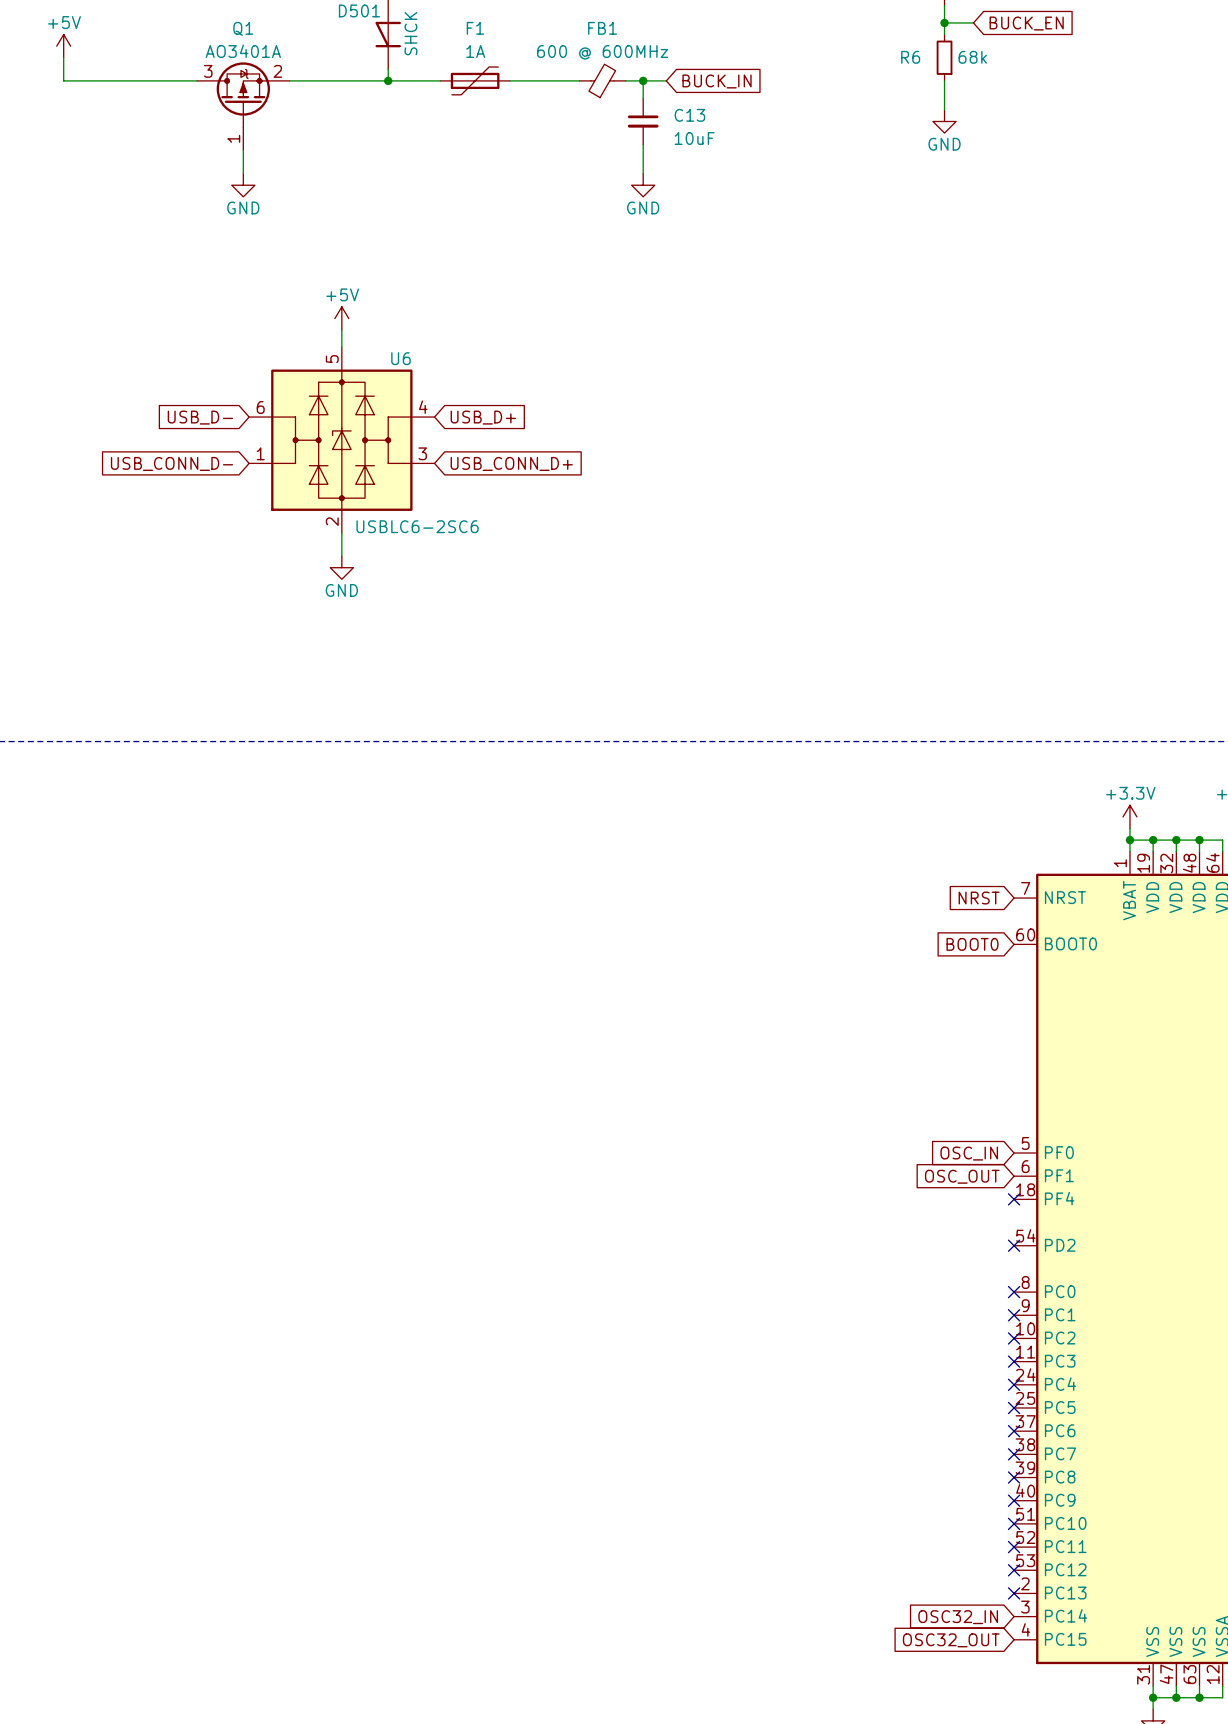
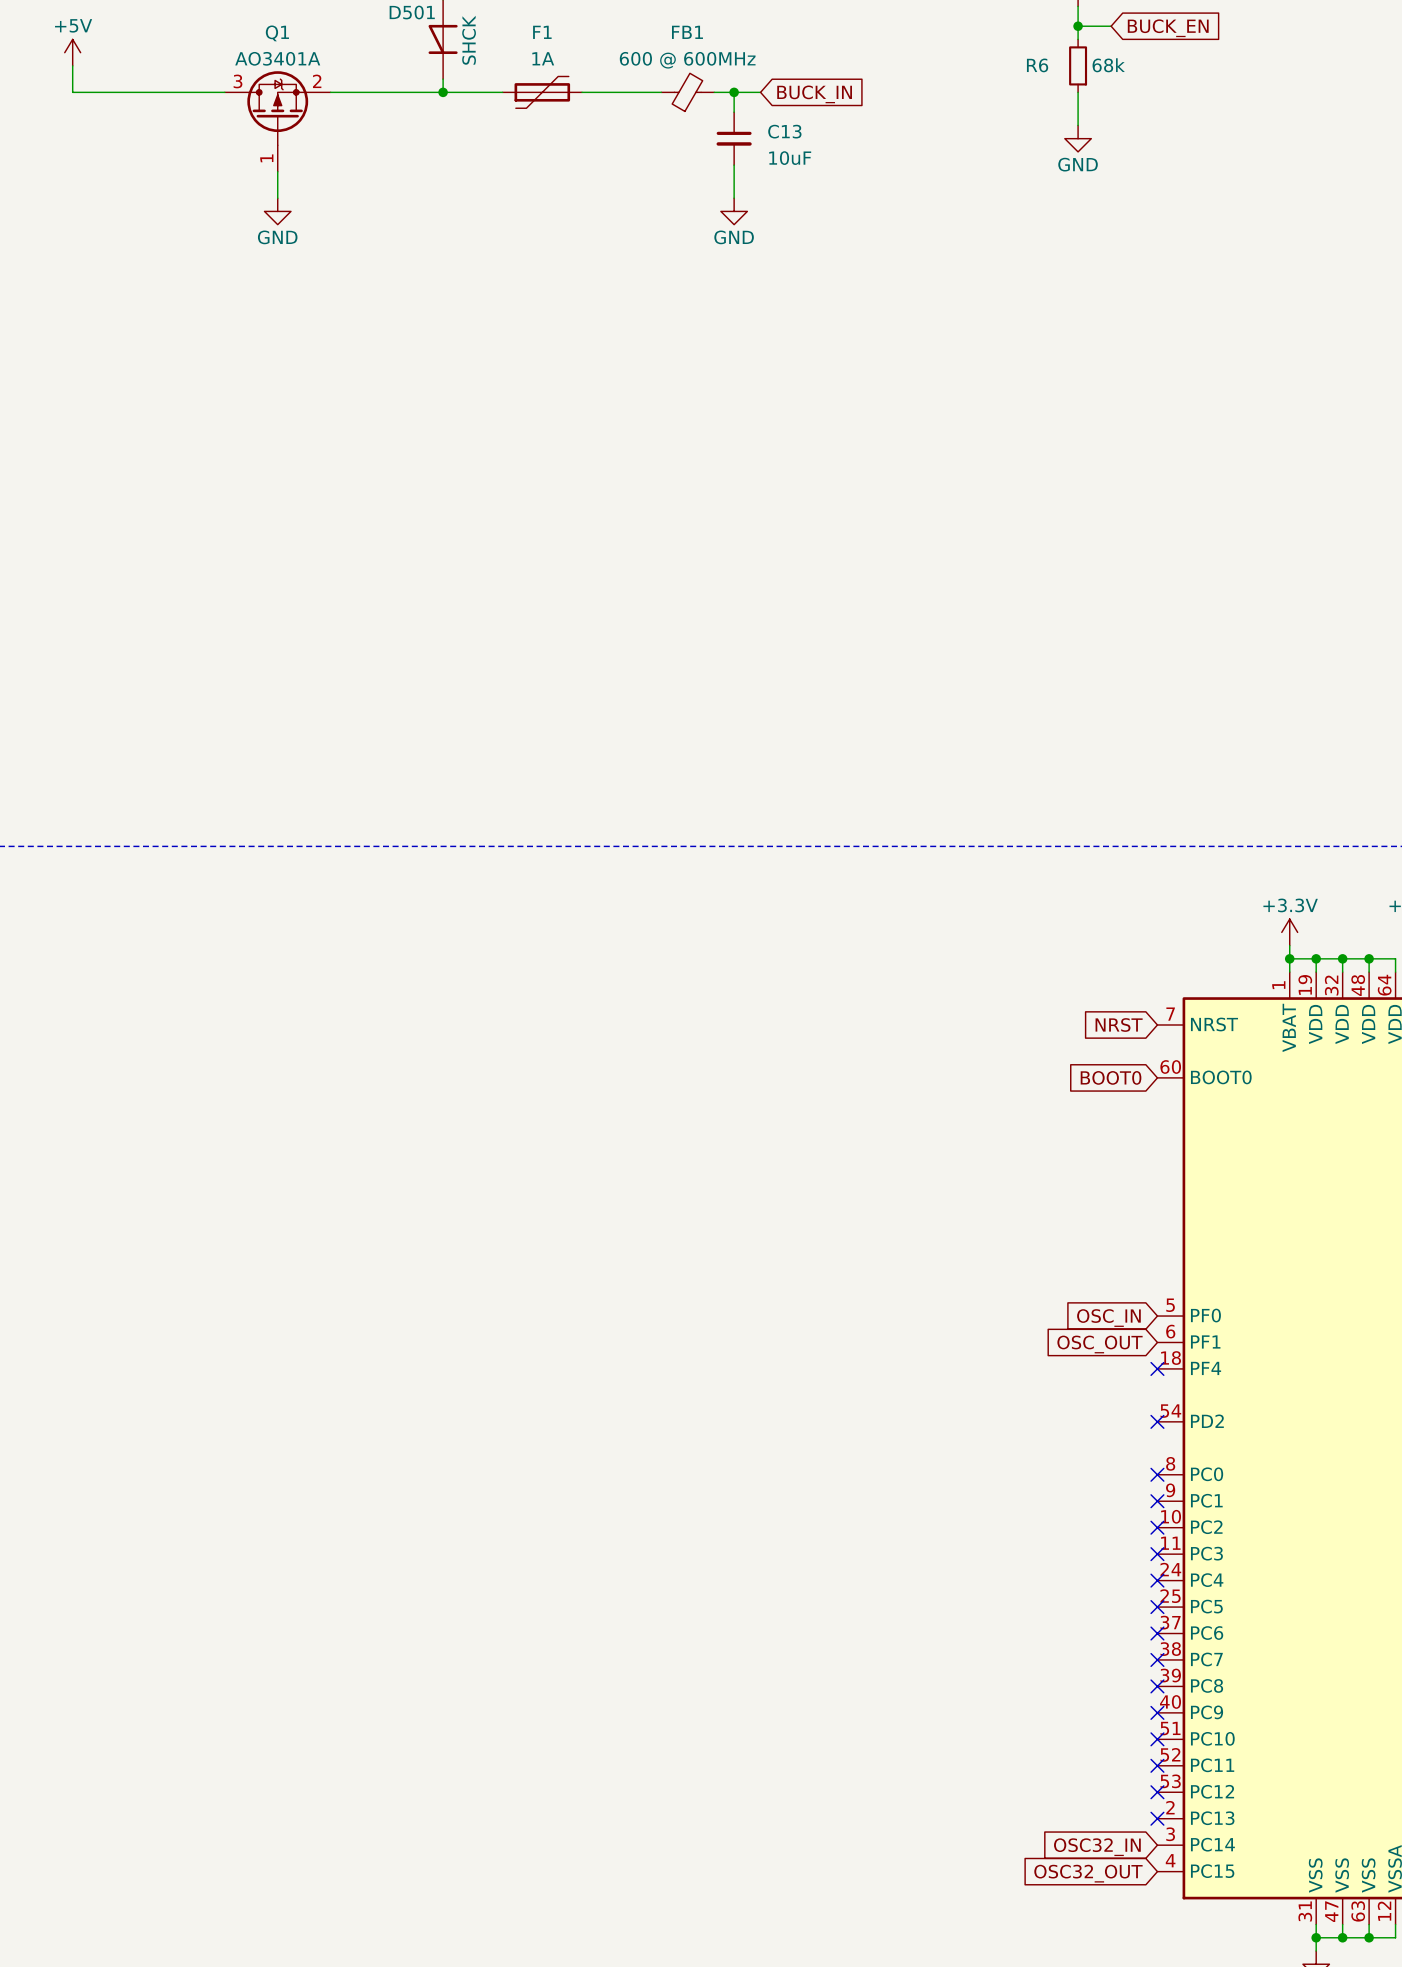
power symbol: +5V (341, 318) -> none
wire: (341, 330) (341, 347) -> none
global label: USB_D- (200, 417) -> none
global label: USB_D+ (483, 417) -> none
U6: USBLC6-2SC6 (341, 440) -> none
global label: USB_CONN_D- (171, 463) -> none
global label: USB_CONN_D+ (511, 463) -> none
wire: (341, 532) (341, 556) -> none
power symbol: GND (341, 567) -> none

